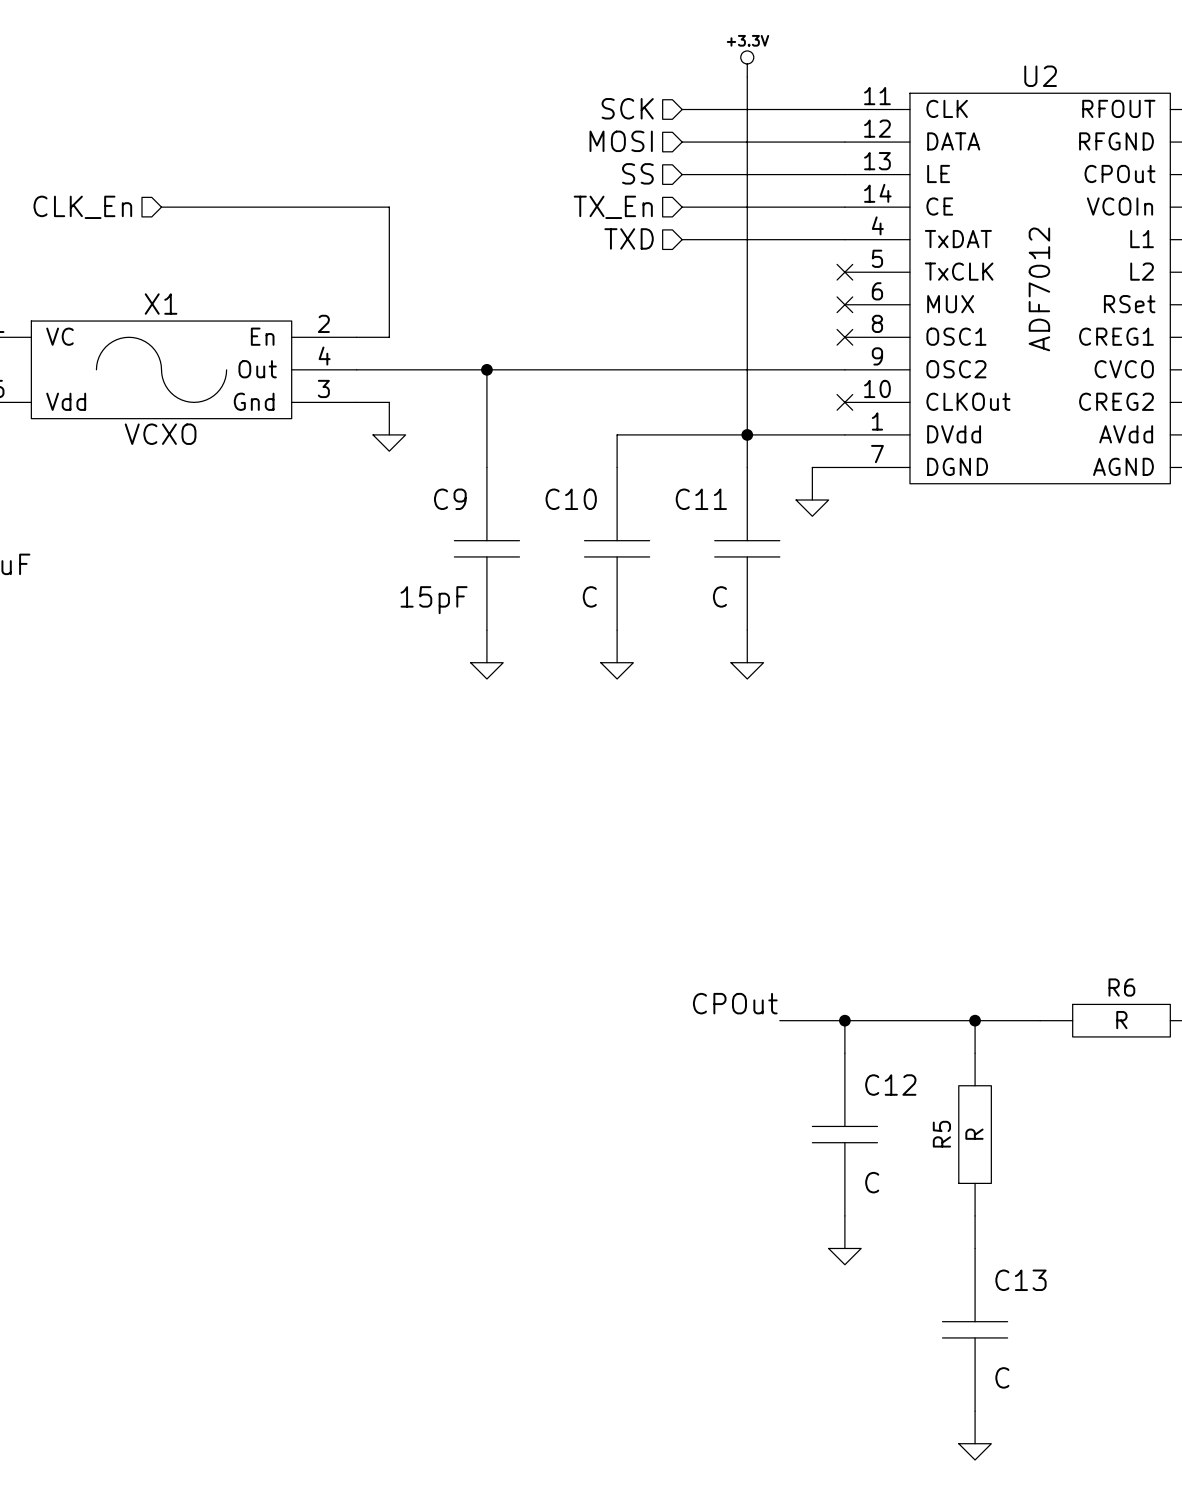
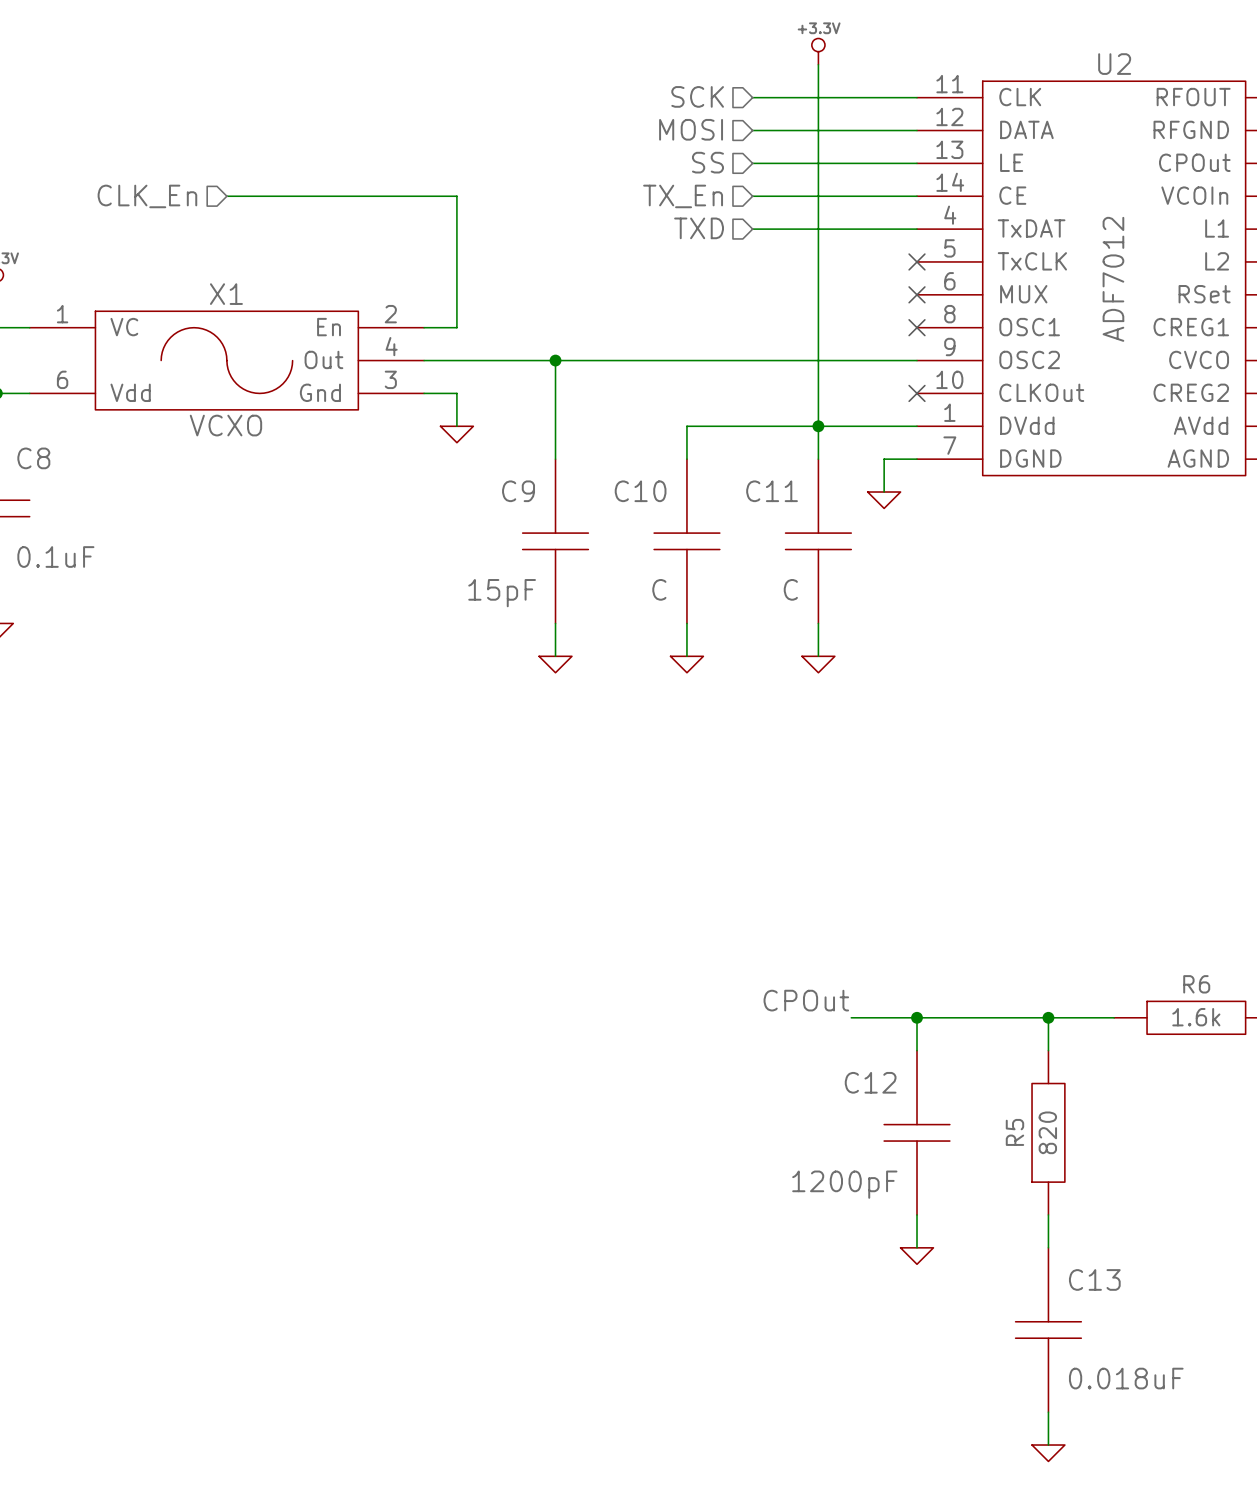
R6 value: R (1121, 1020) -> 1.6k (1196, 1017)
C12 name position: C12 (890, 1085) -> C12 (870, 1082)
R5 value: R (974, 1134) -> 820 (1047, 1132)
C12 value: C (872, 1182) -> 1200pF (844, 1184)
C13 value: C (1002, 1377) -> 0.018uF (1126, 1378)

